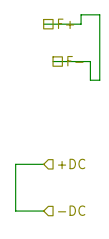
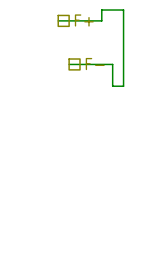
hierarchical label: +DC (71, 163) -> none
wire: (43, 164) (15, 164) (15, 211) (43, 211) -> none
hierarchical label: -DC (71, 210) -> none

